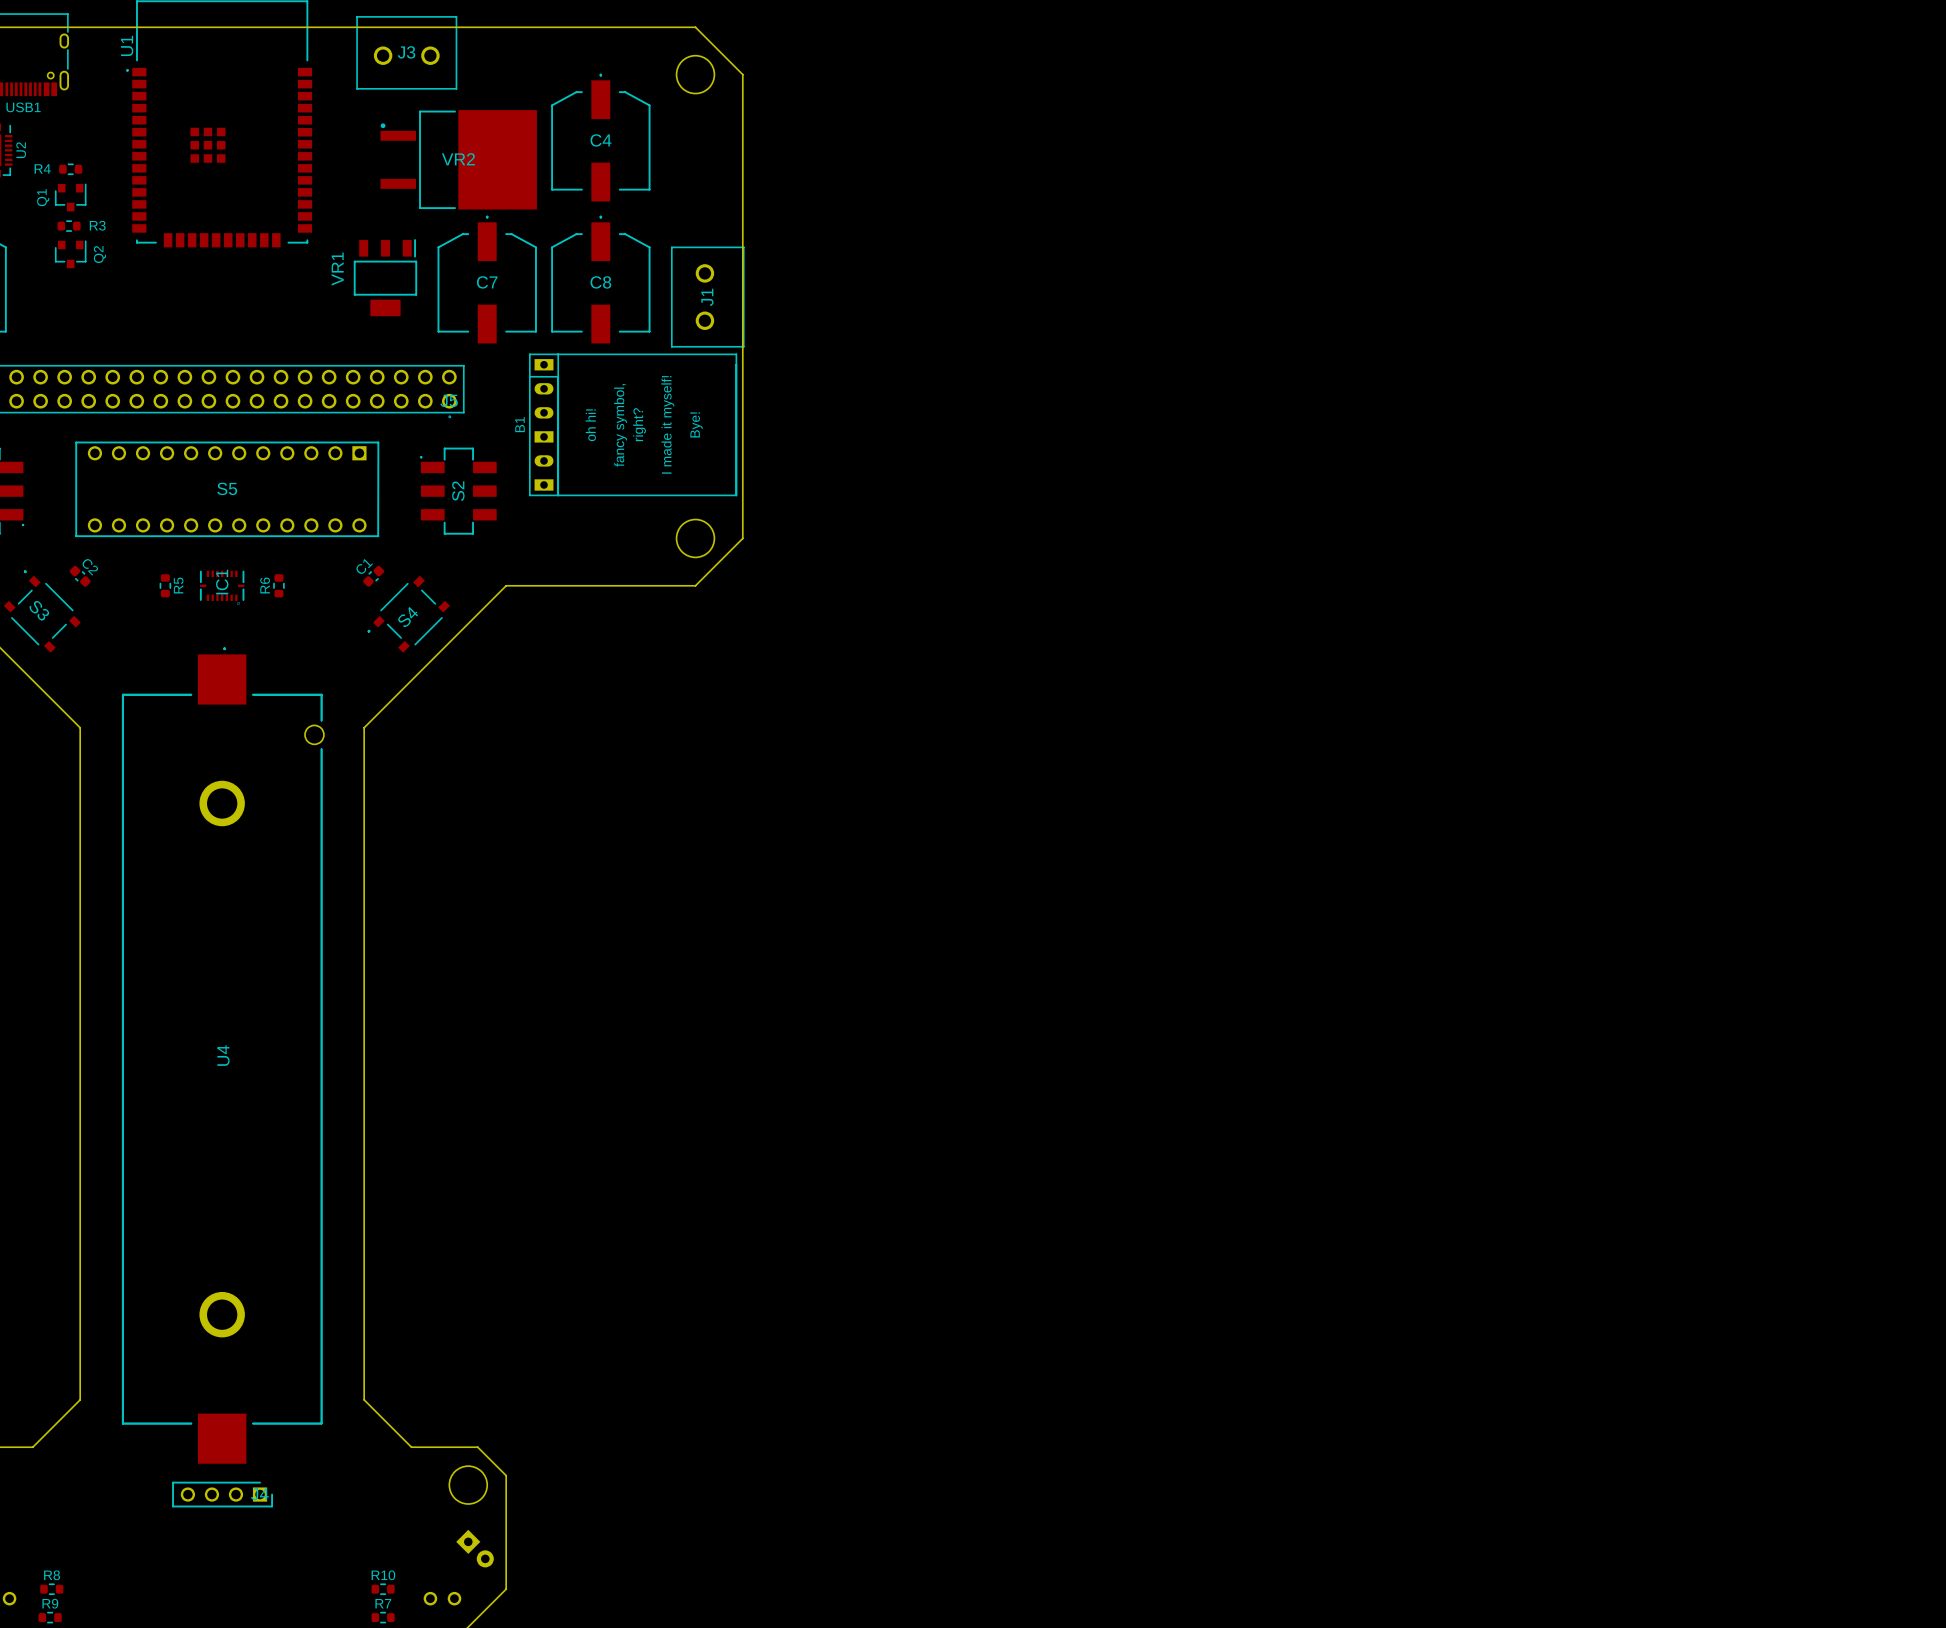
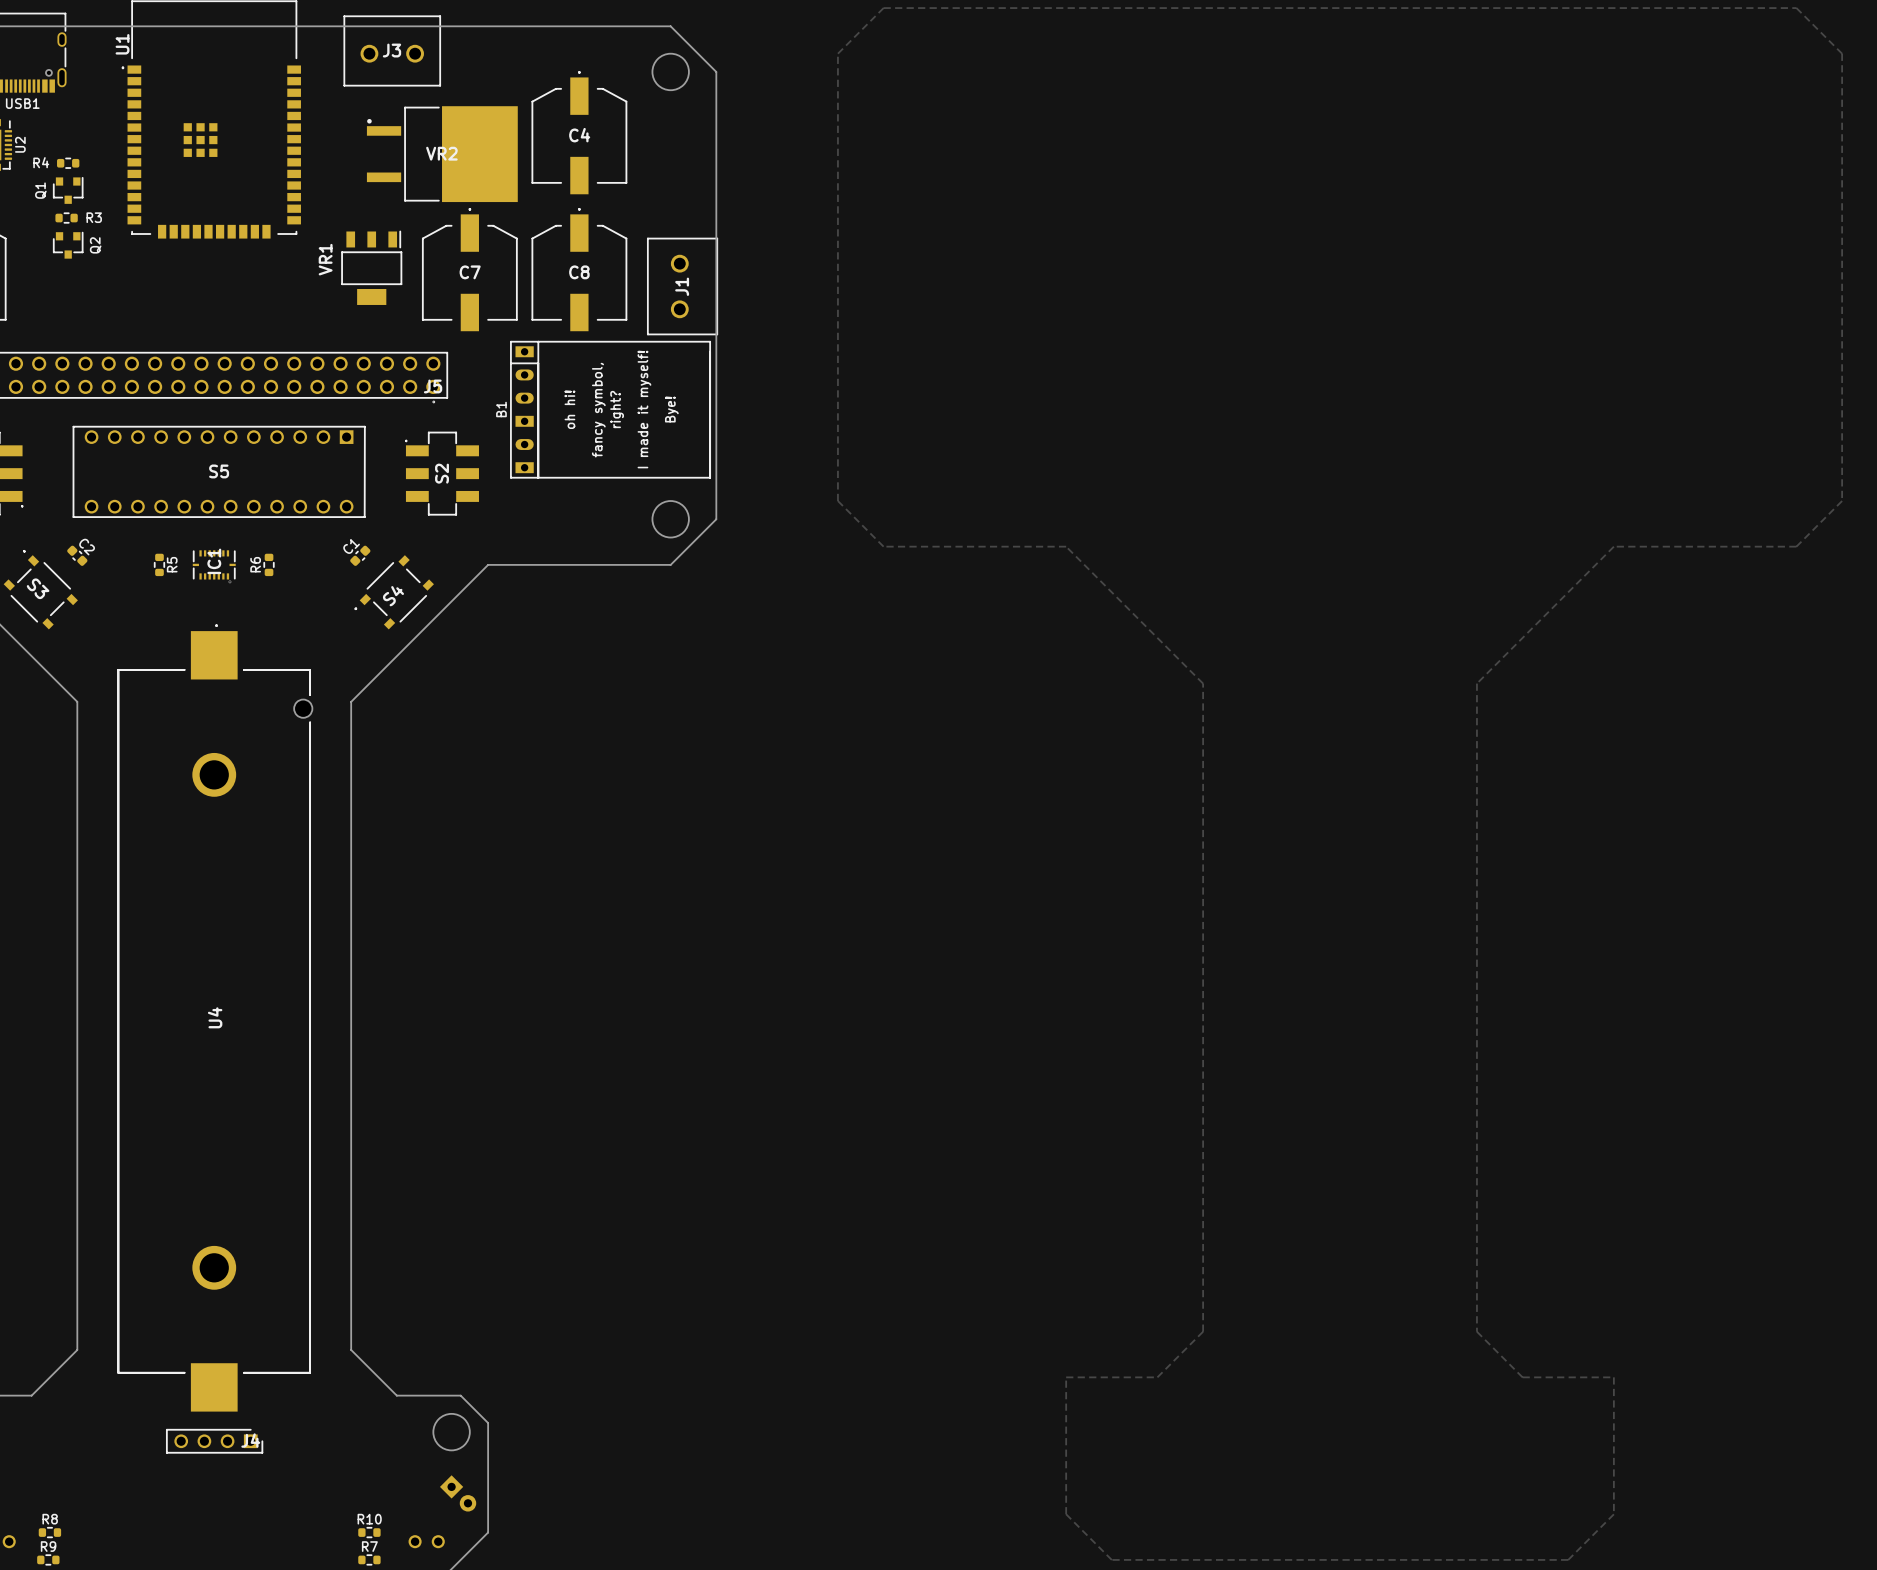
zone outline: none -> (883, 8) (837, 53) (837, 501) (883, 546) (1066, 546) (1203, 683) (1203, 1331) (1157, 1377) (1066, 1377) (1066, 1514) (1111, 1559) (1568, 1559) (1613, 1514) (1613, 1377) (1522, 1377) (1476, 1331) (1476, 683) (1613, 546) (1796, 546) (1842, 501) (1842, 53) (1796, 8) (883, 8)

